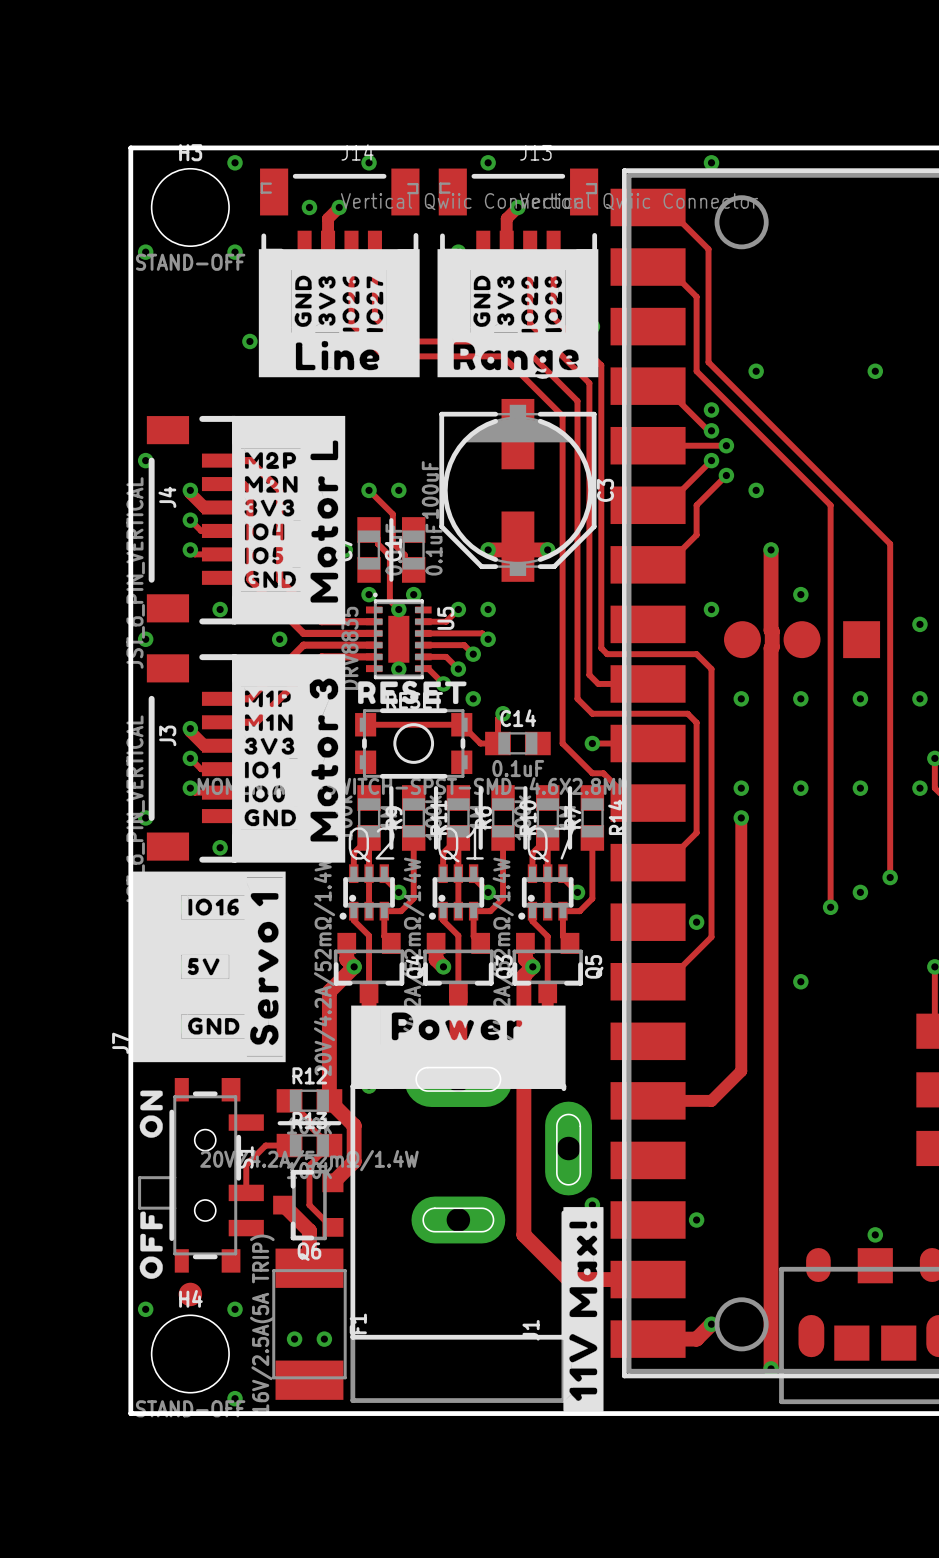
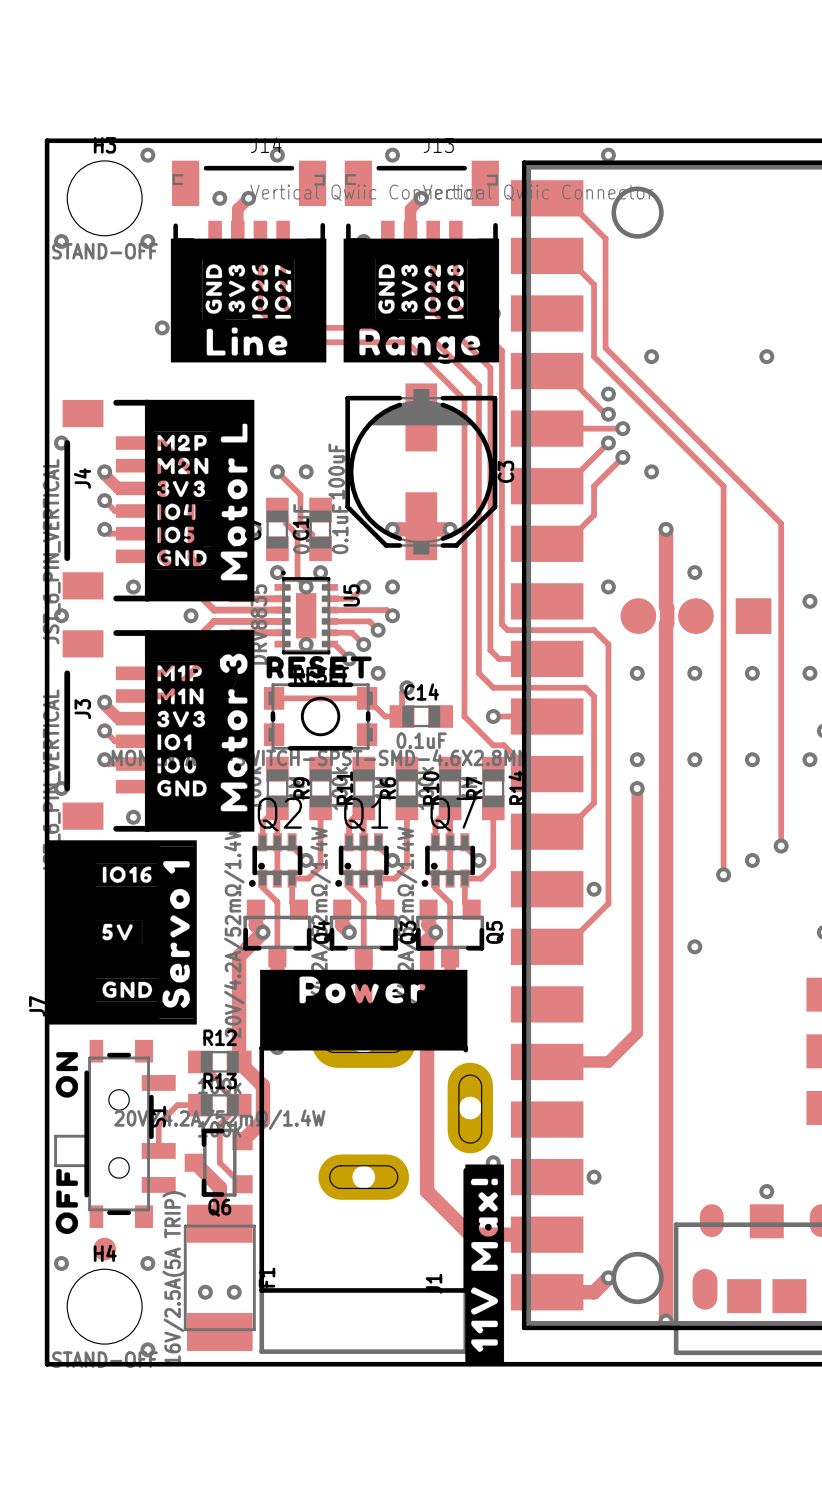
line: (391, 520) (391, 579) -> none
line: (391, 788) (391, 847) -> none
line: (436, 788) (436, 847) -> none
line: (480, 788) (480, 847) -> none
line: (525, 788) (525, 847) -> none
line: (570, 788) (570, 847) -> none
line: (279, 1123) (339, 1123) -> none

